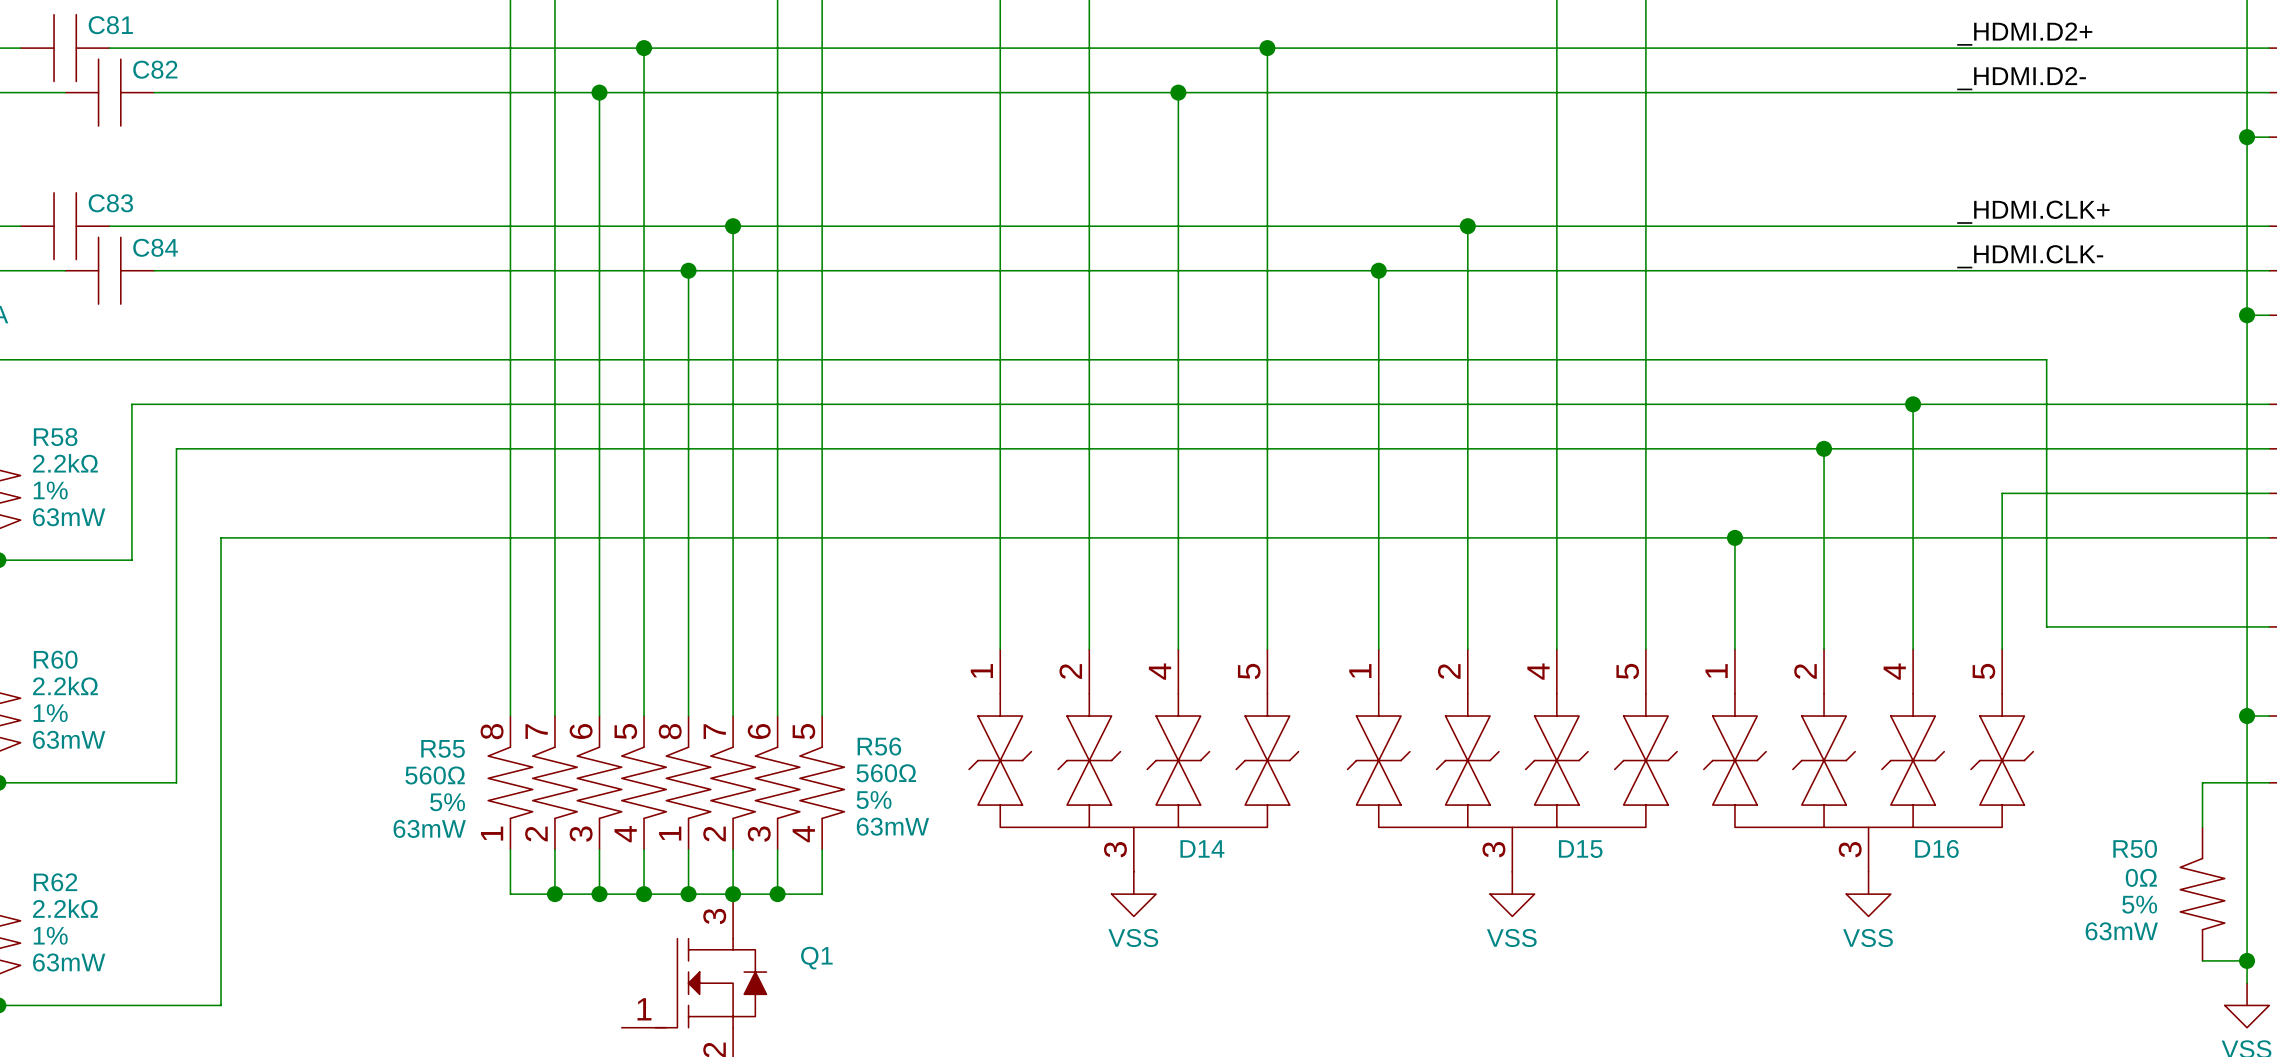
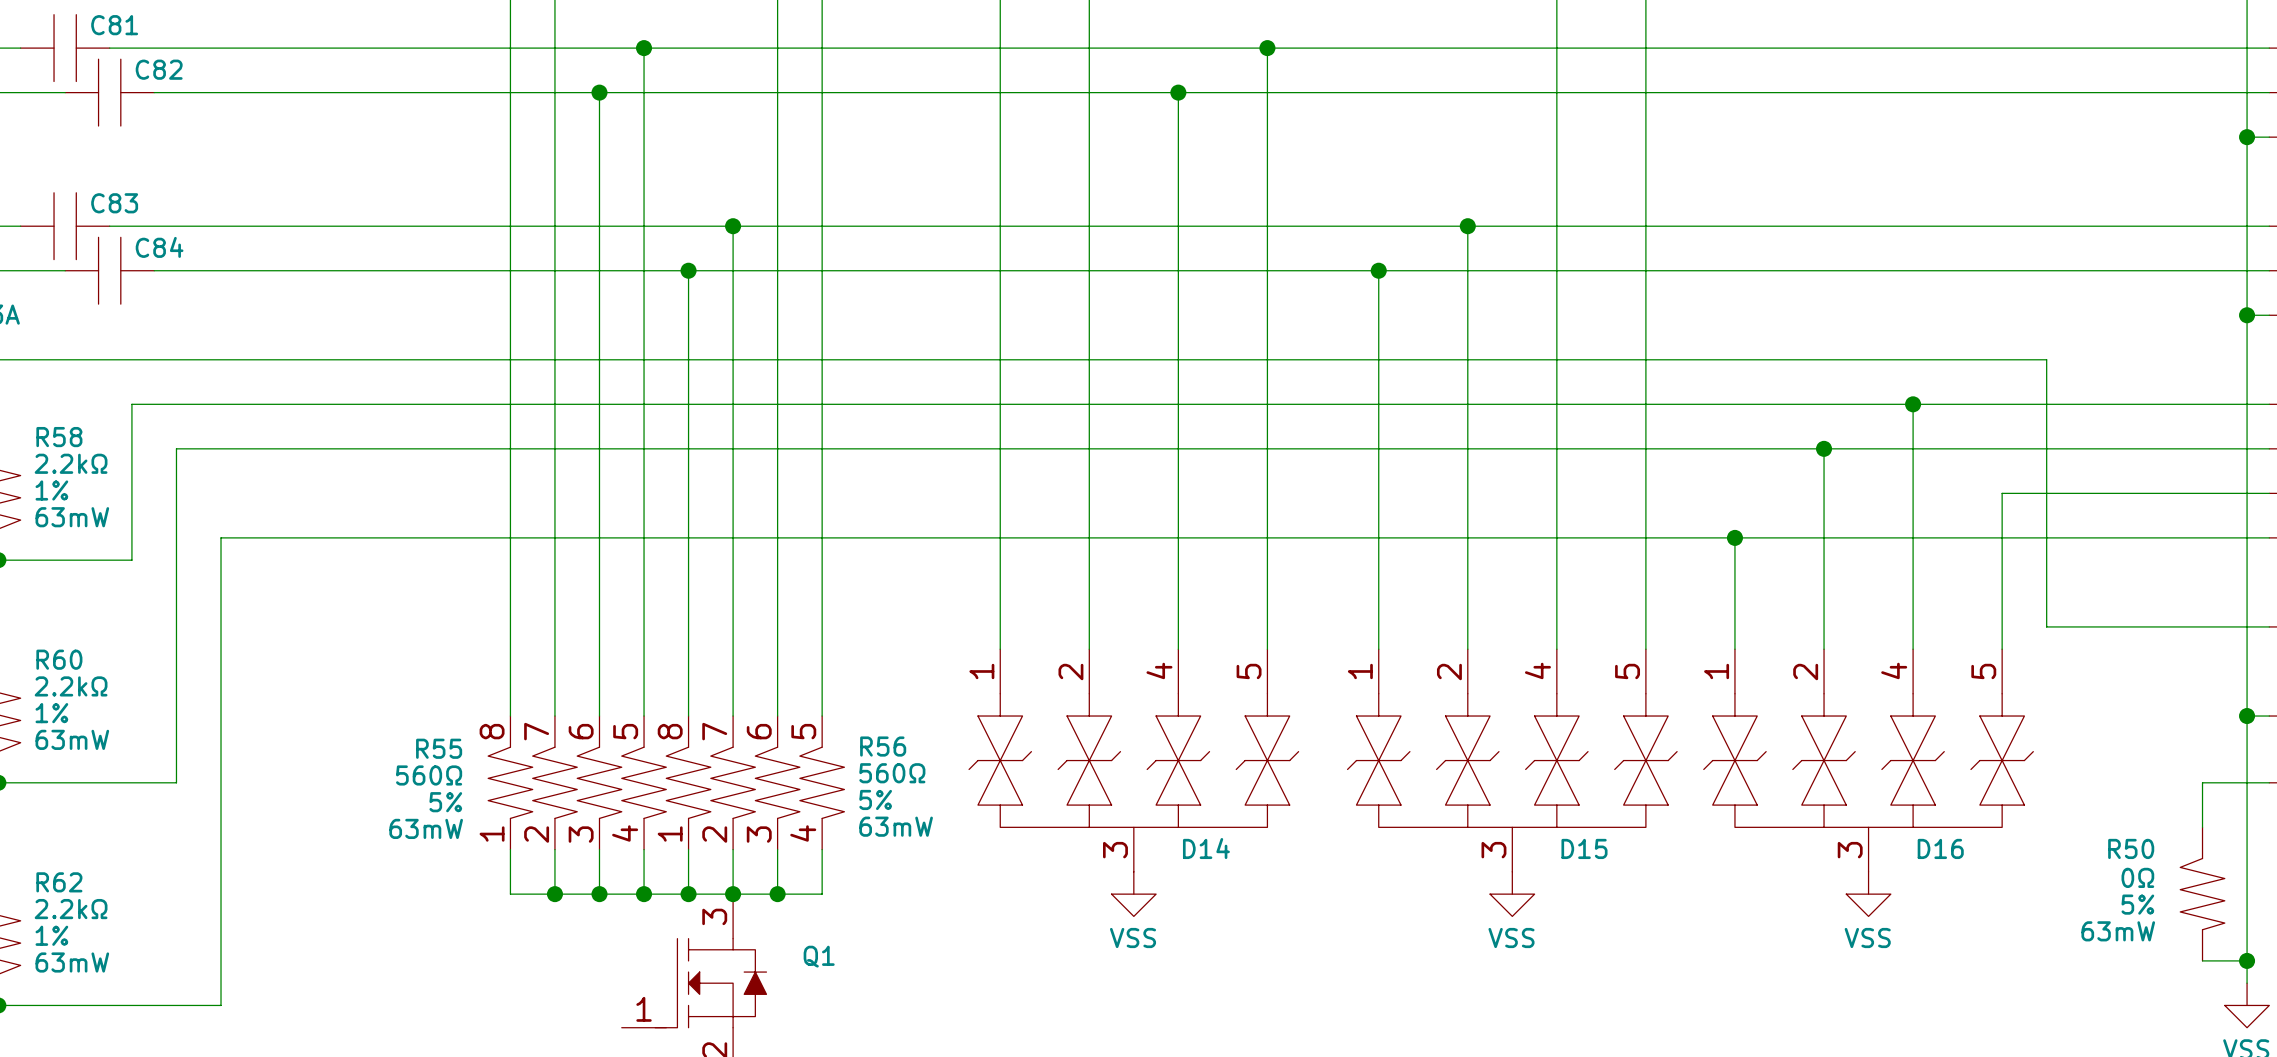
label: _HDMI.D2+ (2024, 34) -> none
label: _HDMI.D2- (2021, 78) -> none
label: _HDMI.CLK+ (2033, 212) -> none
label: _HDMI.CLK- (2030, 256) -> none

